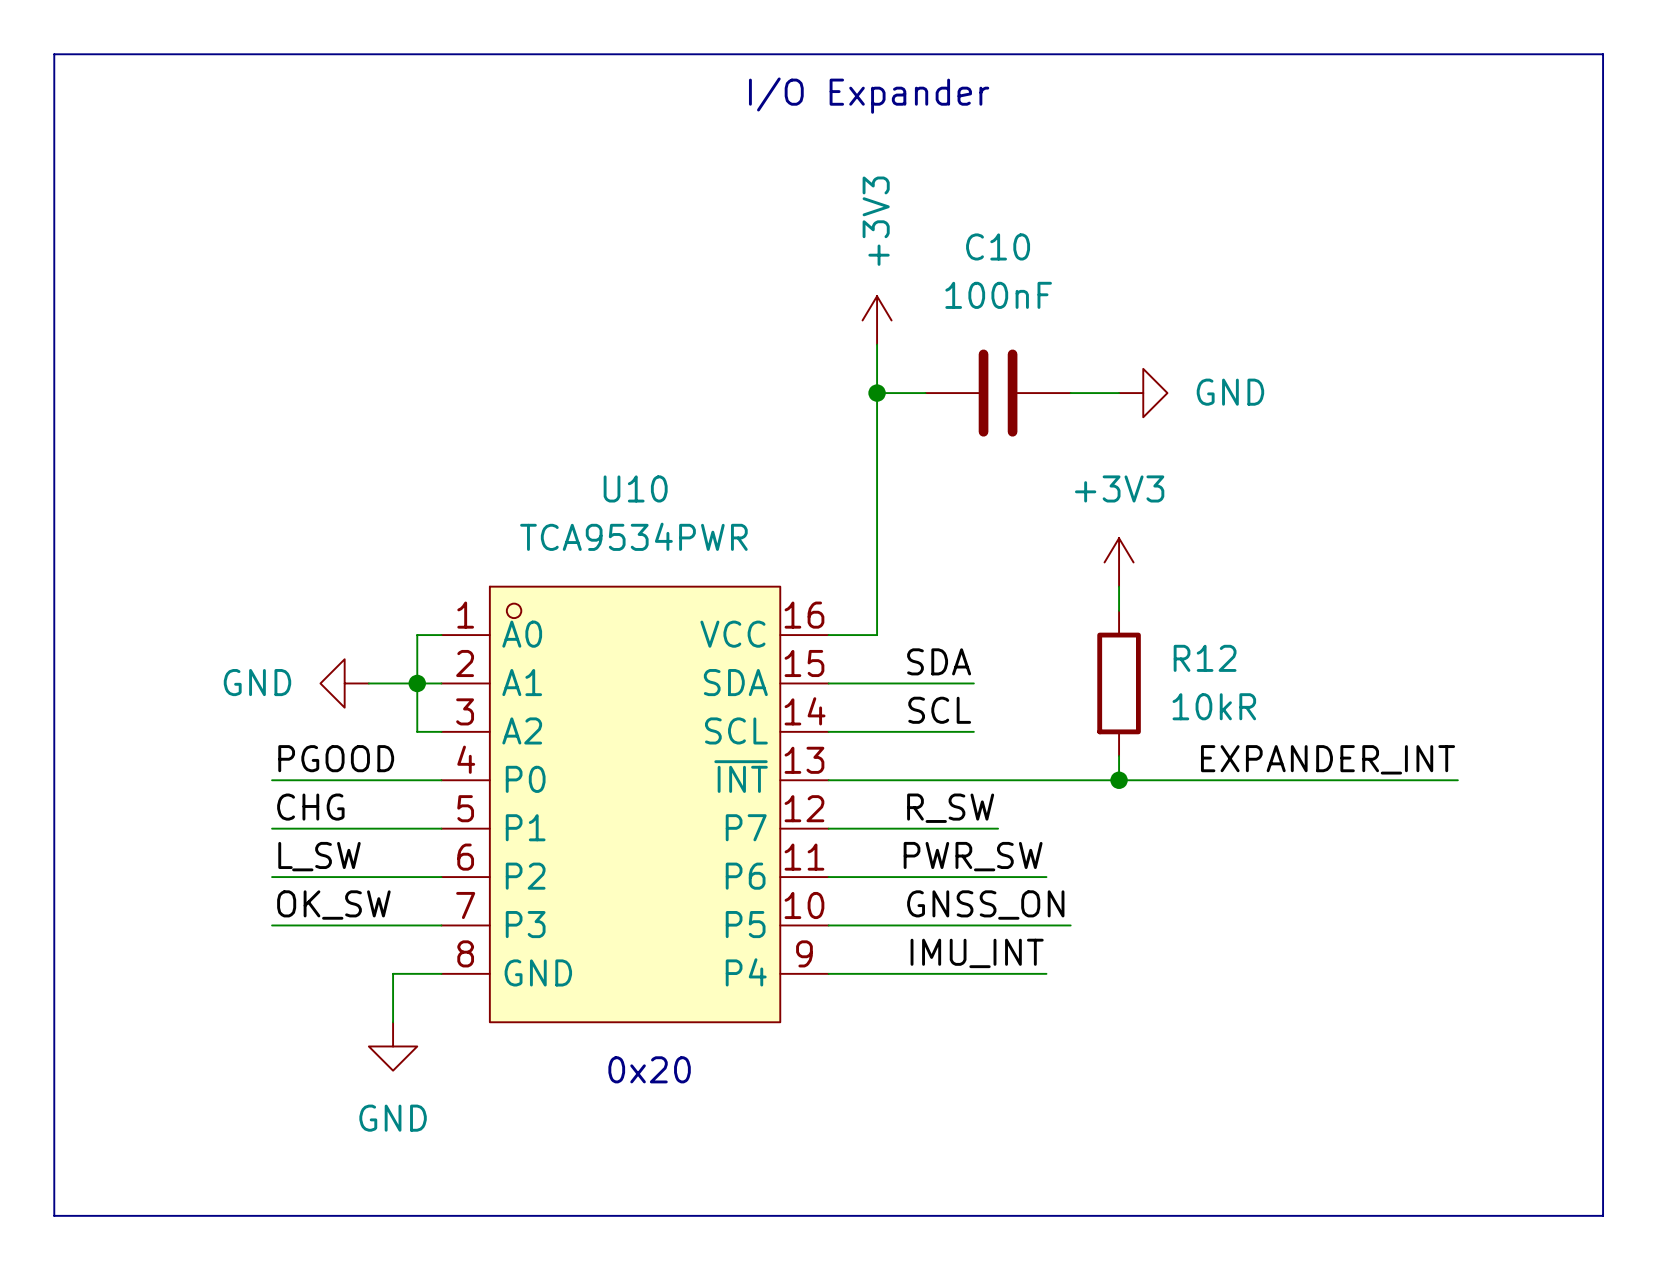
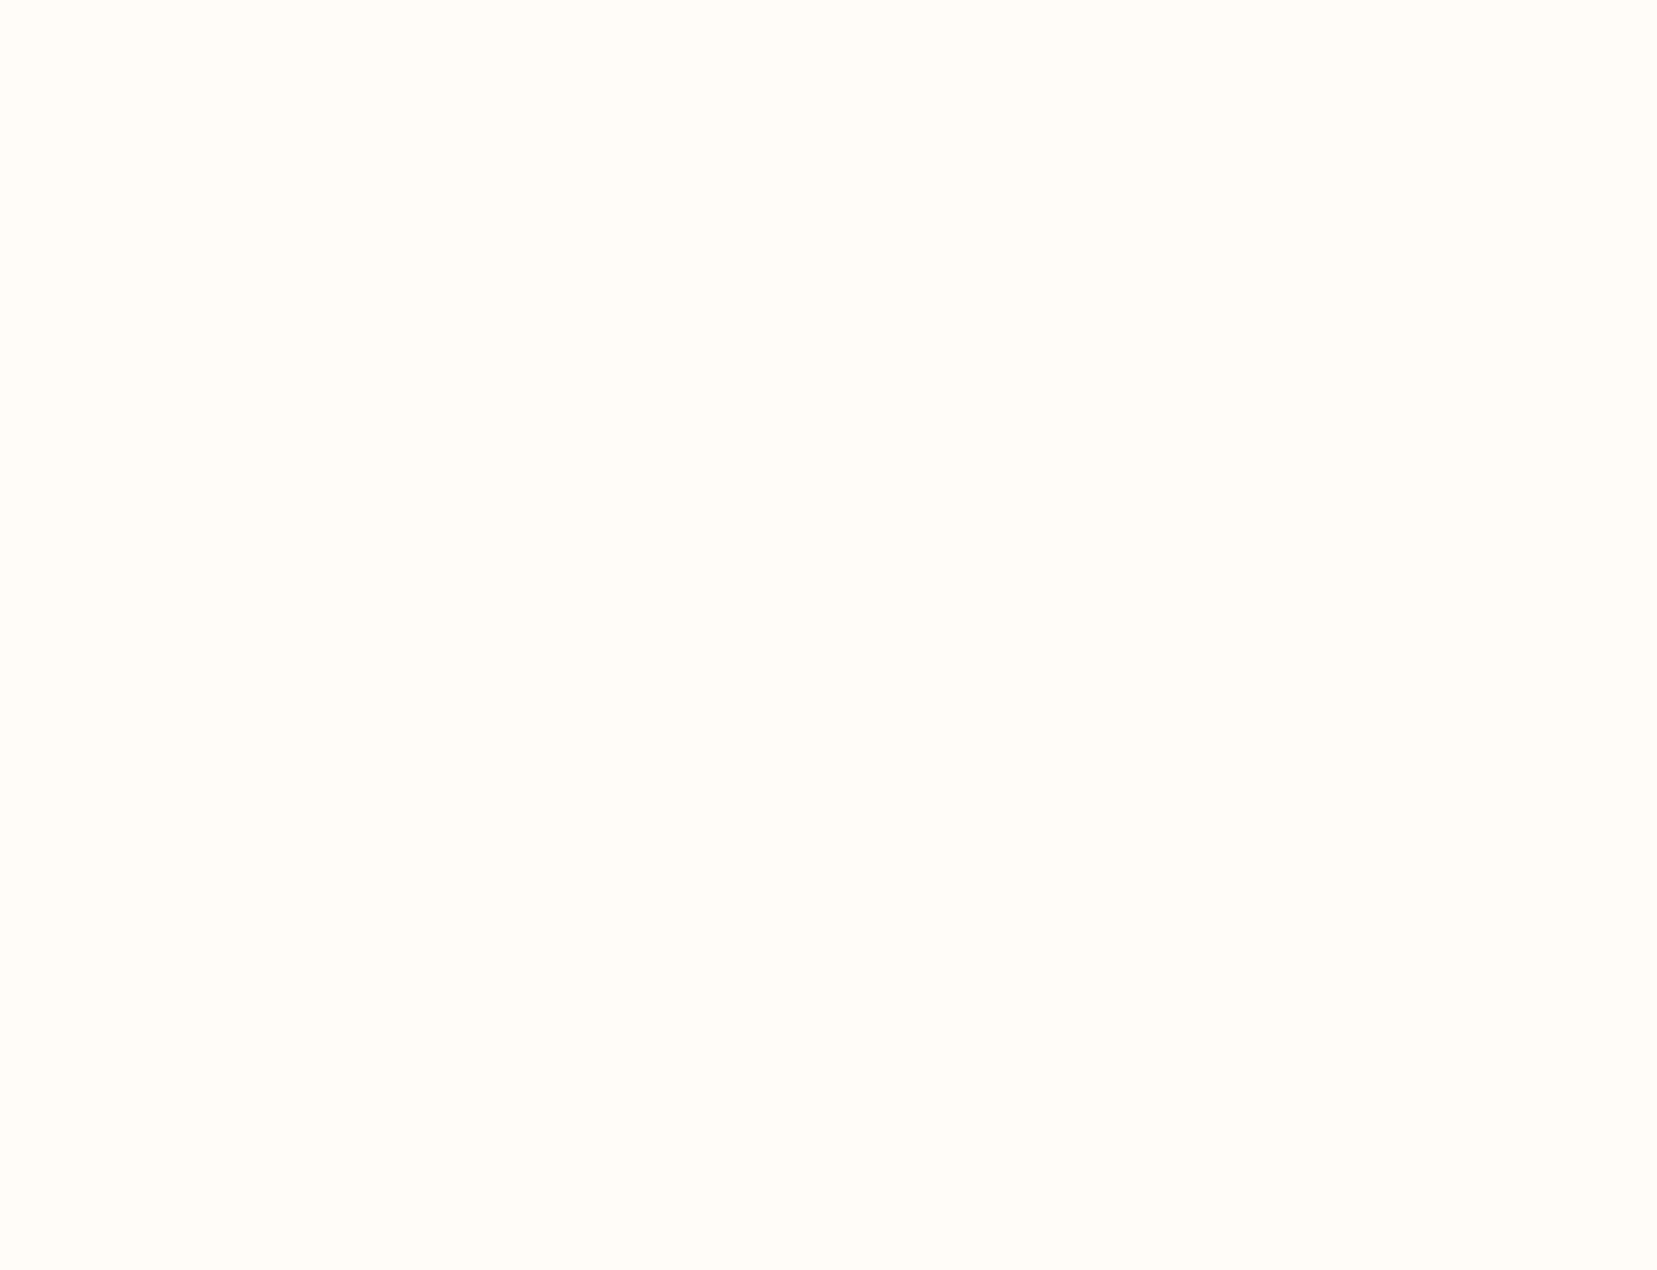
line: (54, 54) (1603, 54) (1603, 1215) (54, 1215) (54, 54) -> none
text: I/O Expander (869, 95) -> none
power symbol: +3V3 (877, 320) -> none
wire: (877, 344) (877, 635) (828, 635) -> none
wire: (877, 393) (925, 393) -> none
junction: (877, 393) -> none
C10: 100nF (998, 393) -> none
wire: (1070, 393) (1119, 393) -> none
power symbol: GND (1143, 393) -> none
power symbol: +3V3 (1119, 562) -> none
wire: (1119, 586) (1119, 610) -> none
wire: (441, 635) (417, 635) (417, 731) (441, 731) -> none
label: SDA (939, 661) -> none
power symbol: GND (344, 683) -> none
wire: (368, 683) (441, 683) -> none
junction: (417, 683) -> none
wire: (828, 683) (973, 683) -> none
R12: 10kR (1119, 683) -> none
label: SCL (939, 710) -> none
wire: (828, 731) (973, 731) -> none
wire: (1119, 756) (1119, 780) -> none
label: PGOOD (336, 758) -> none
label: EXPANDER_INT (1328, 759) -> none
wire: (272, 780) (441, 780) -> none
wire: (828, 780) (1457, 780) -> none
junction: (1119, 780) -> none
U10: TCA9534PWR (635, 804) -> none
label: CHG (310, 807) -> none
label: R_SW (950, 808) -> none
wire: (272, 828) (441, 828) -> none
wire: (828, 828) (998, 828) -> none
label: L_SW (319, 856) -> none
label: PWR_SW (973, 856) -> none
wire: (272, 877) (441, 877) -> none
wire: (828, 877) (1046, 877) -> none
label: OK_SW (333, 905) -> none
label: GNSS_ON (985, 905) -> none
wire: (272, 925) (441, 925) -> none
wire: (828, 925) (1070, 925) -> none
label: IMU_INT (977, 953) -> none
wire: (441, 973) (393, 973) (393, 1022) -> none
wire: (828, 973) (1046, 973) -> none
power symbol: GND (393, 1046) -> none
text: 0x20 (649, 1069) -> none

